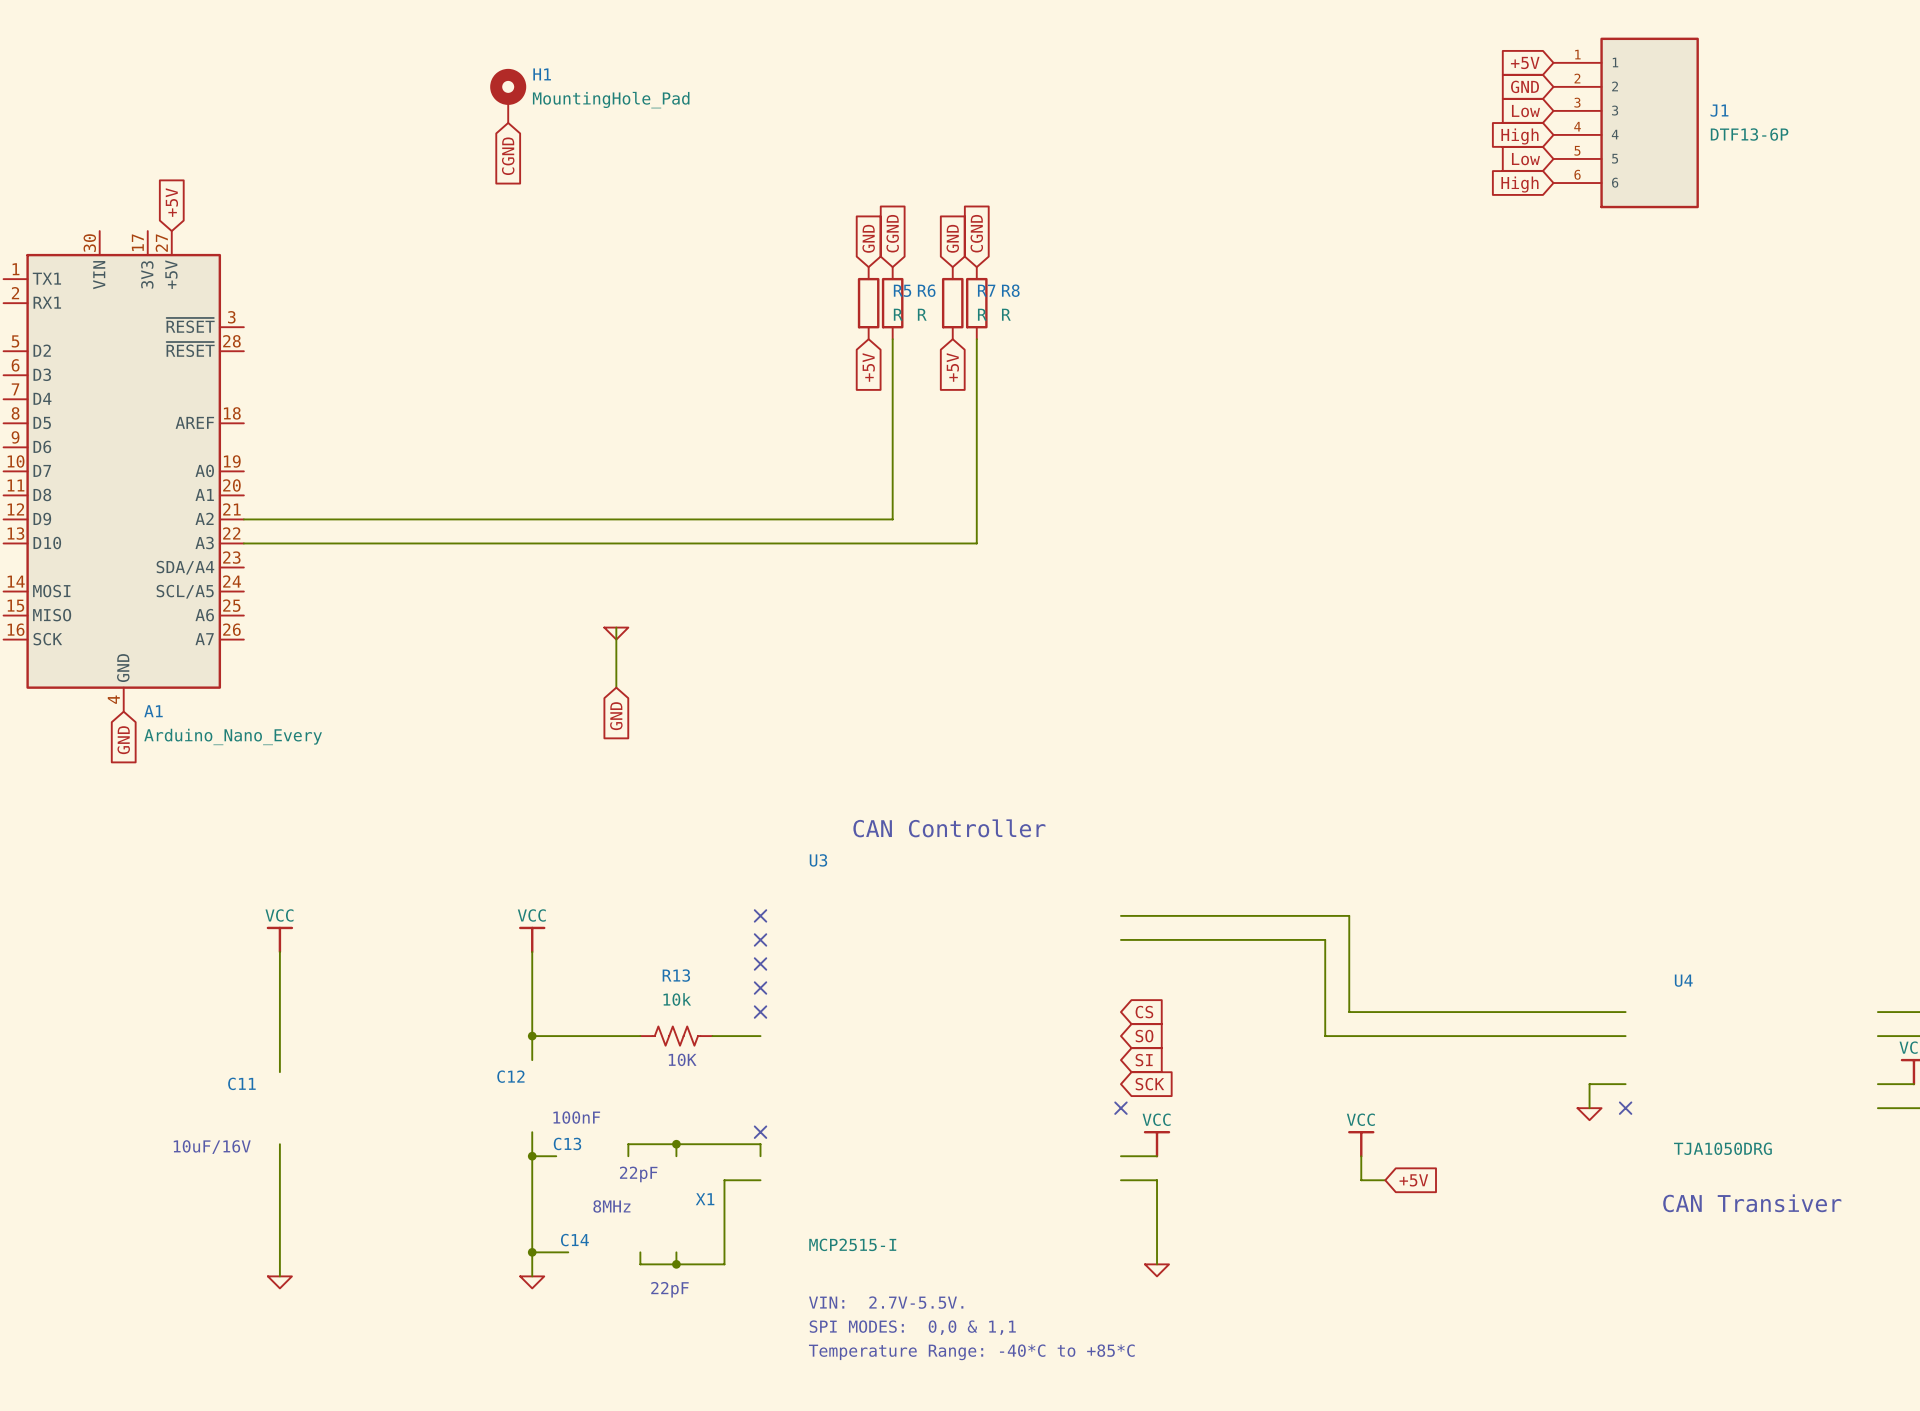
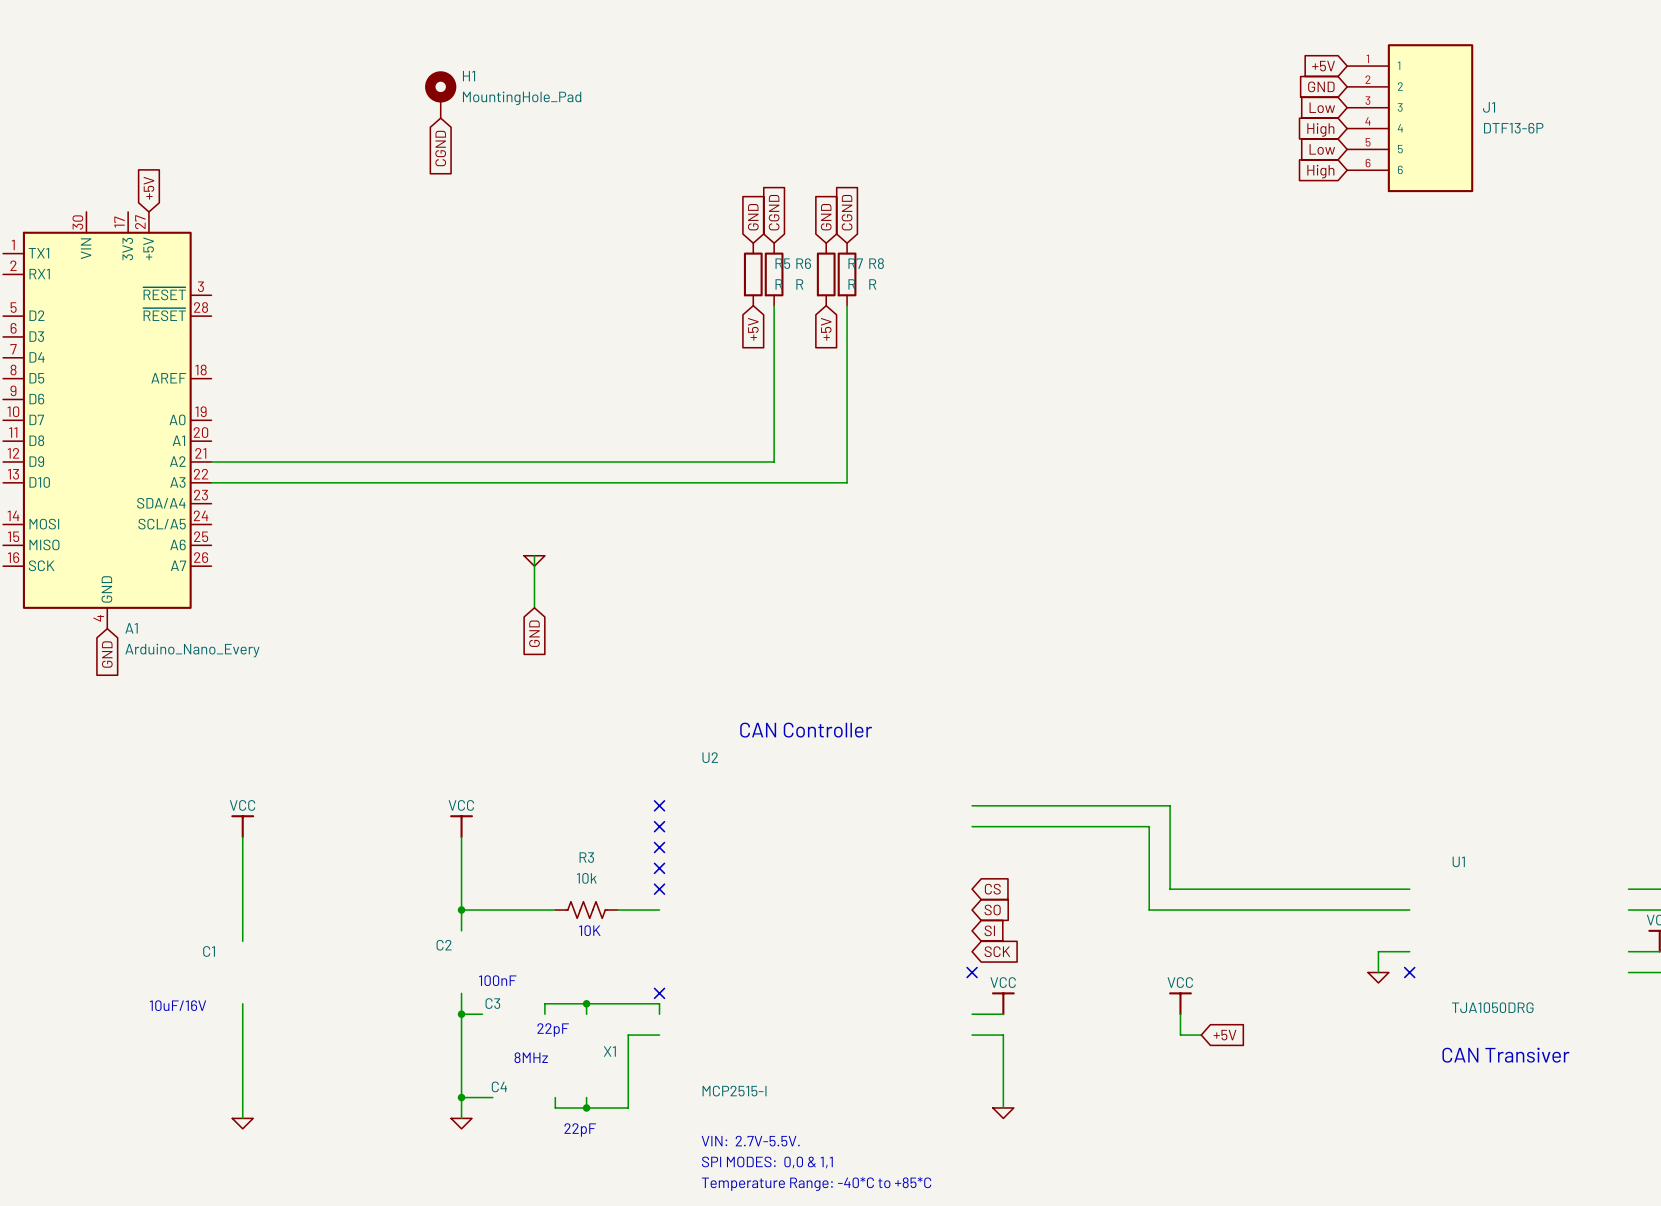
U3 name: U3 (818, 860) -> U2 (710, 757)
R13 name: R13 (676, 975) -> R3 (586, 857)
U4 name: U4 (1683, 980) -> U1 (1458, 861)
C12 name: C12 (510, 1076) -> C2 (444, 945)
C11 name: C11 (241, 1083) -> C1 (209, 951)
C13 name: C13 (567, 1143) -> C3 (492, 1003)
C14 name: C14 (574, 1240) -> C4 (499, 1086)

